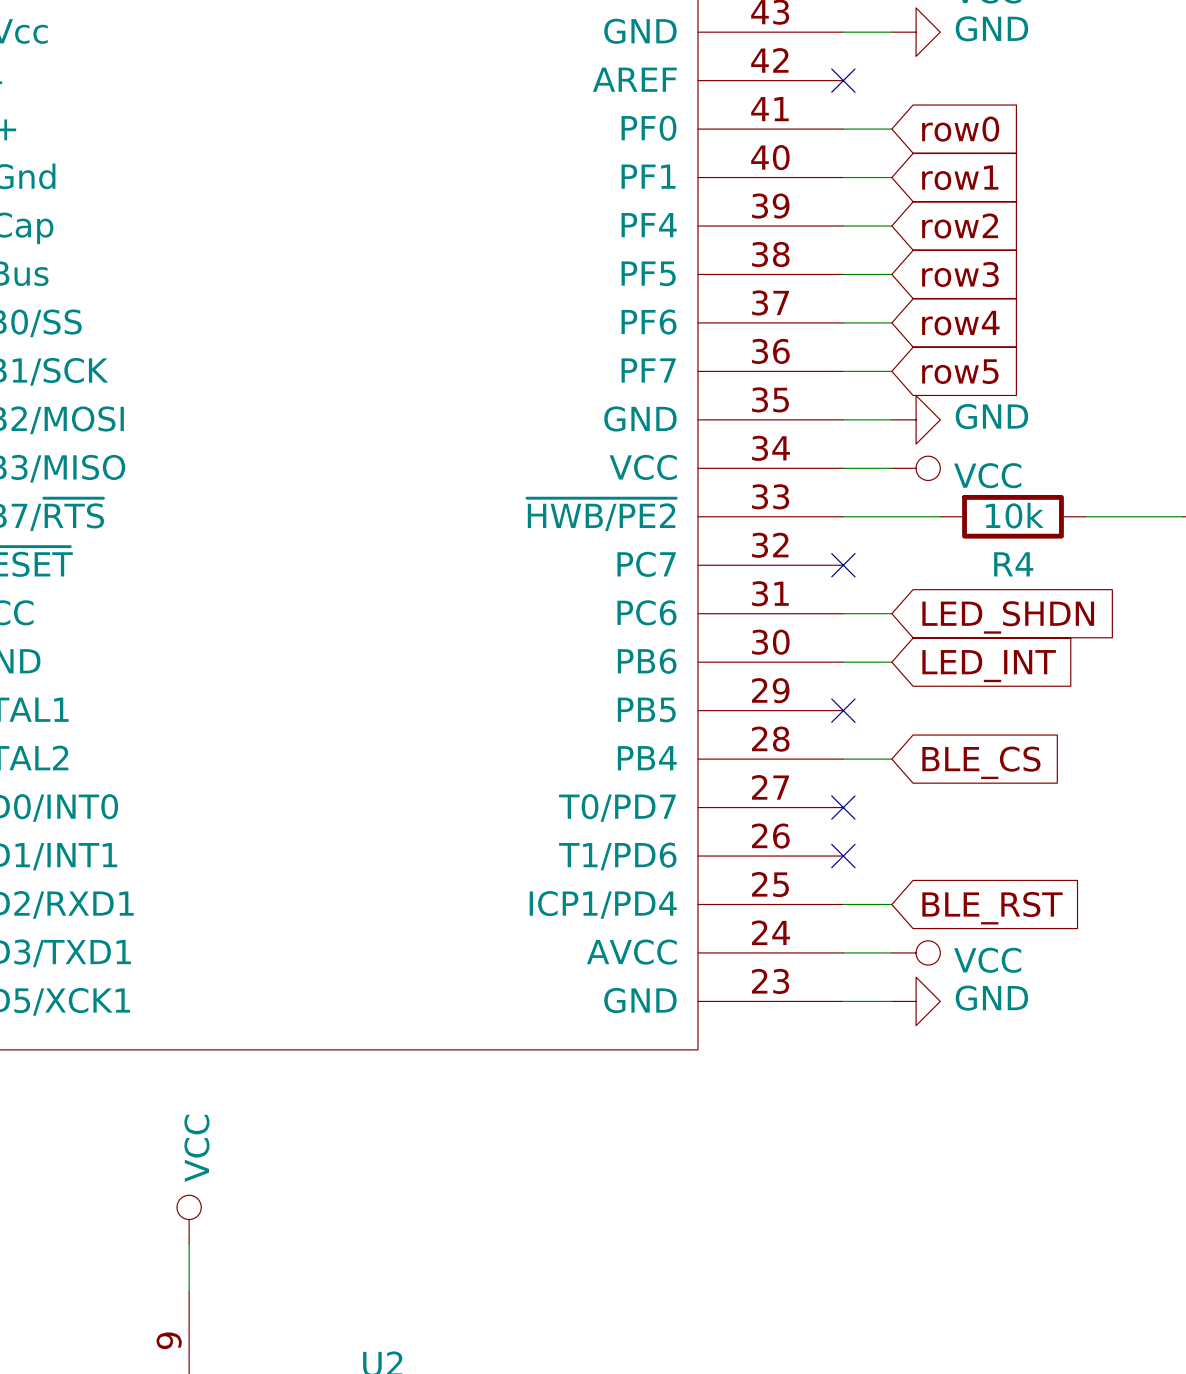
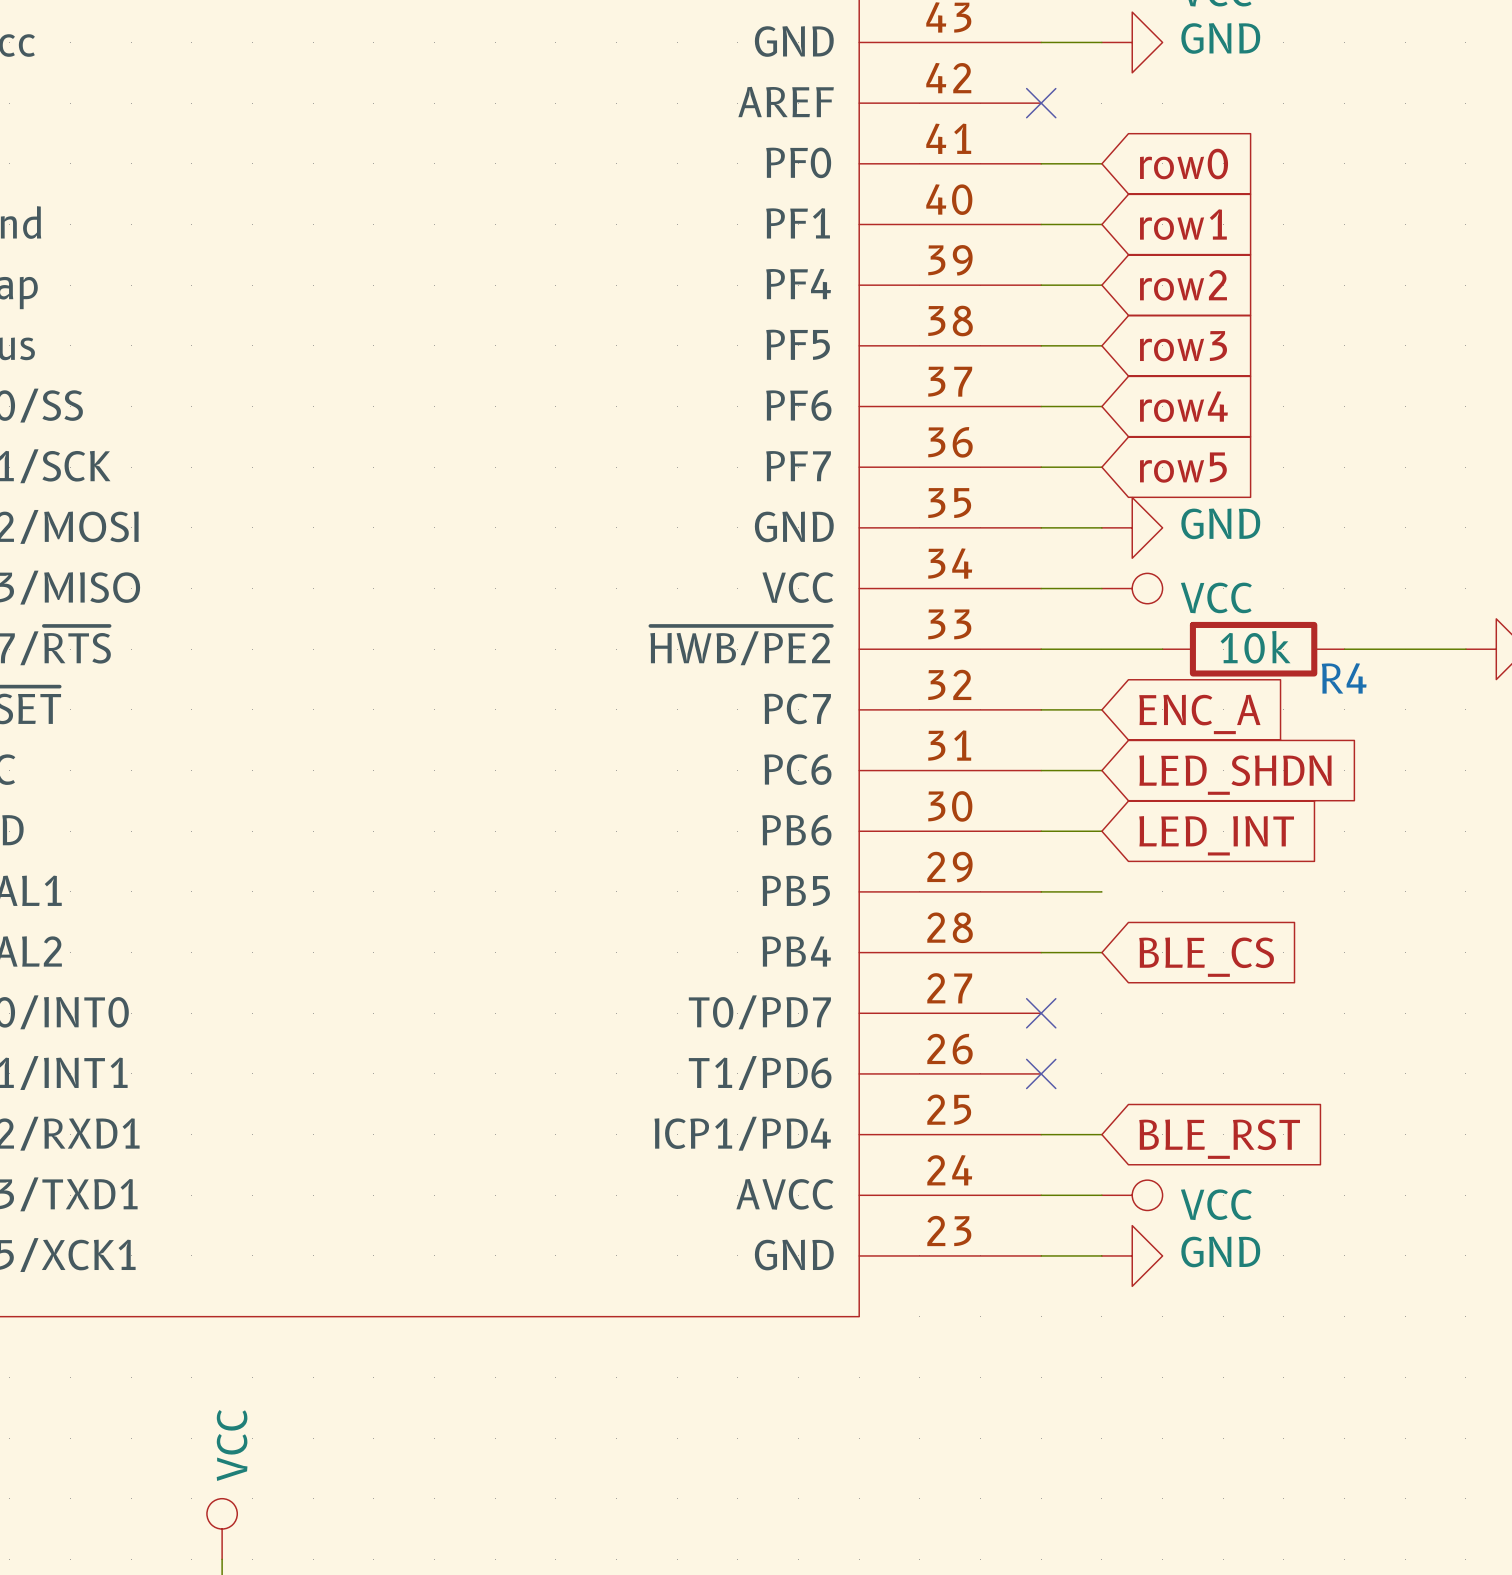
R4 name position: R4 (1013, 564) -> R4 (1344, 678)
wire: none -> (1041, 709) (1101, 709)
no-connect mark: (843, 565) -> none
global label: none -> ENC_A (1199, 714)
wire: none -> (1041, 891) (1101, 891)
no-connect mark: (843, 710) -> none

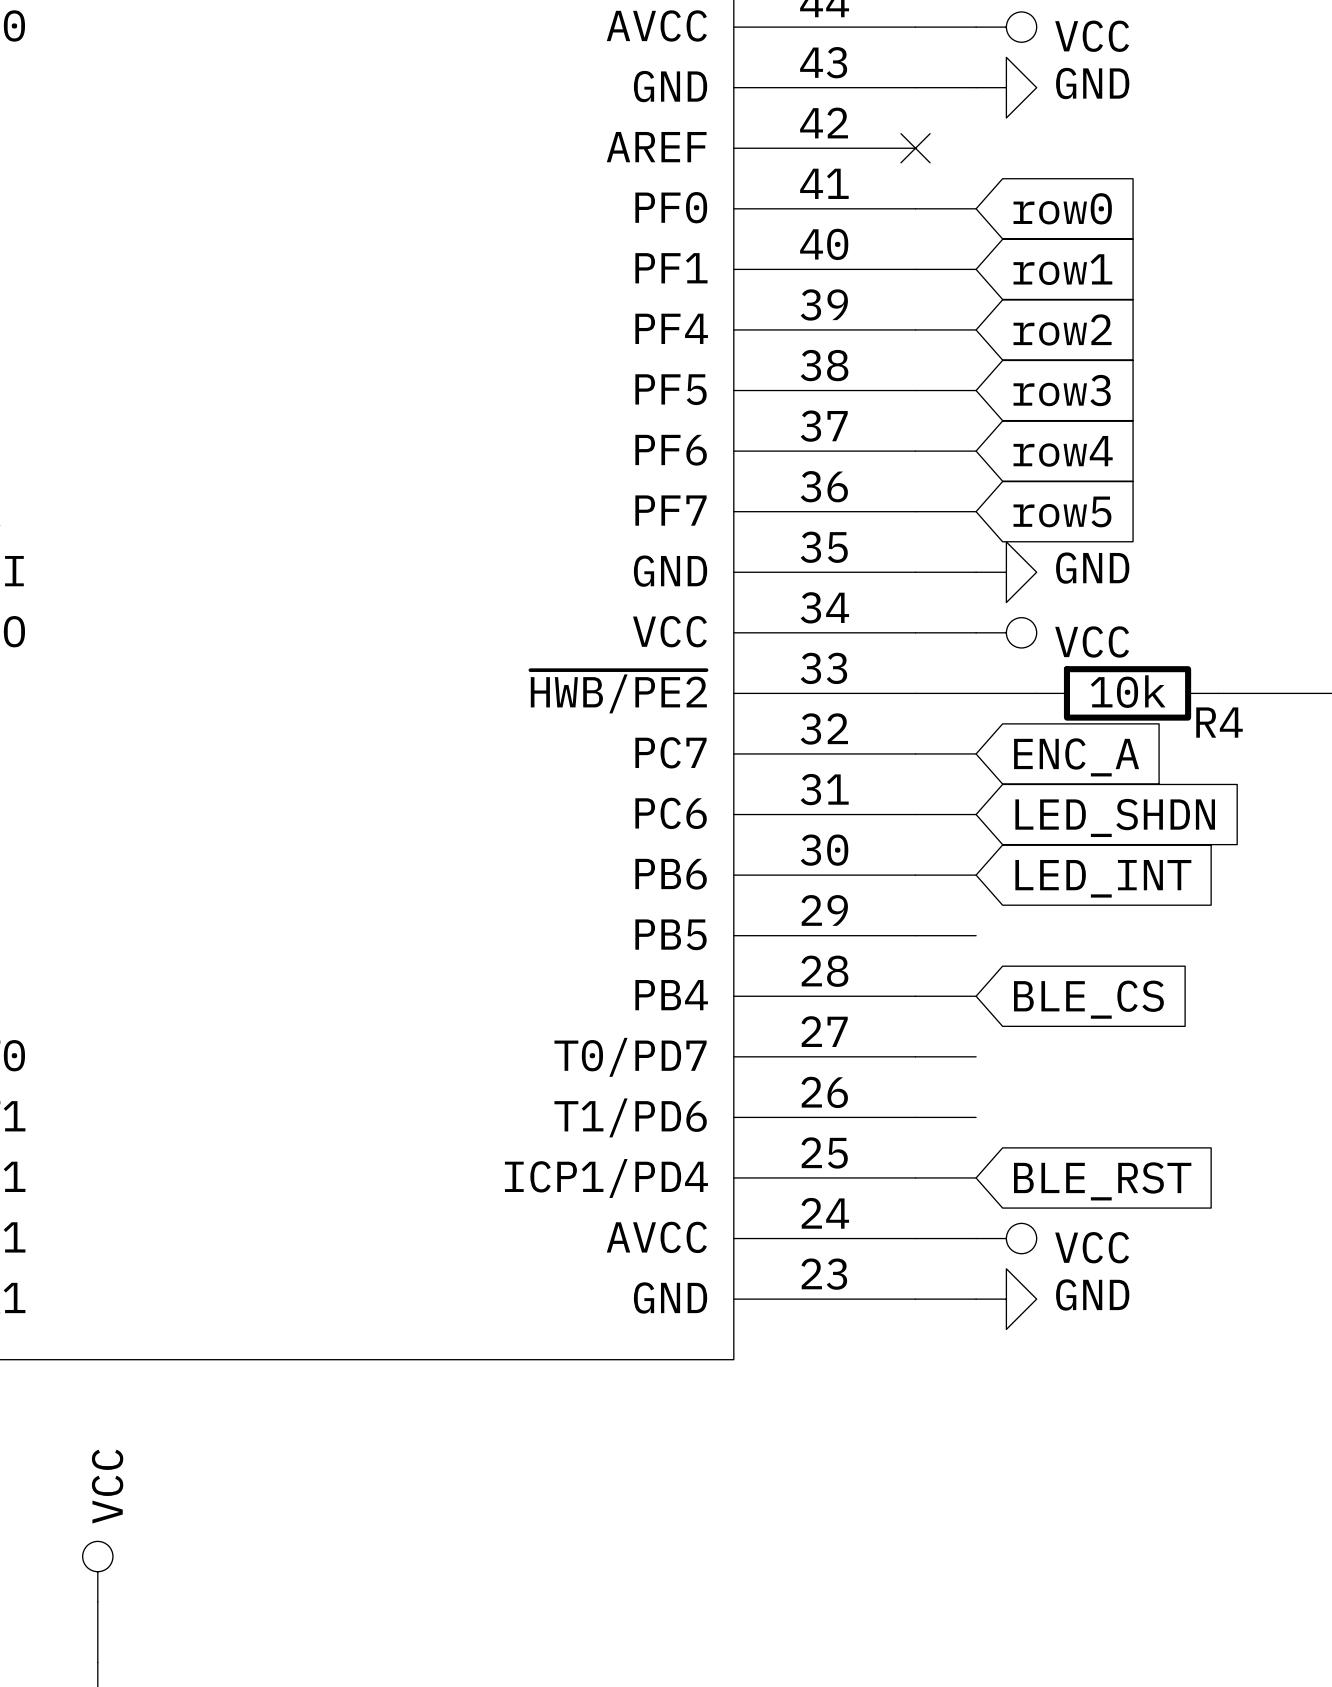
wire: none -> (915, 1056) (976, 1056)
no-connect mark: (1041, 1013) -> none
wire: none -> (915, 1117) (976, 1117)
no-connect mark: (1041, 1073) -> none

